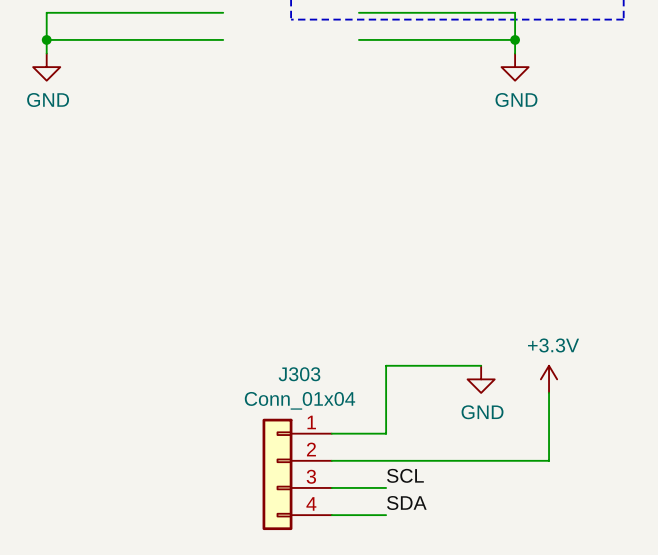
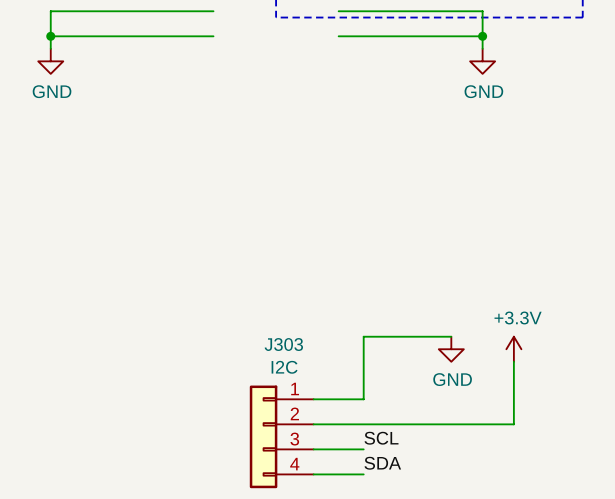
J303 value: Conn_01x04 (299, 400) -> I2C (284, 367)

